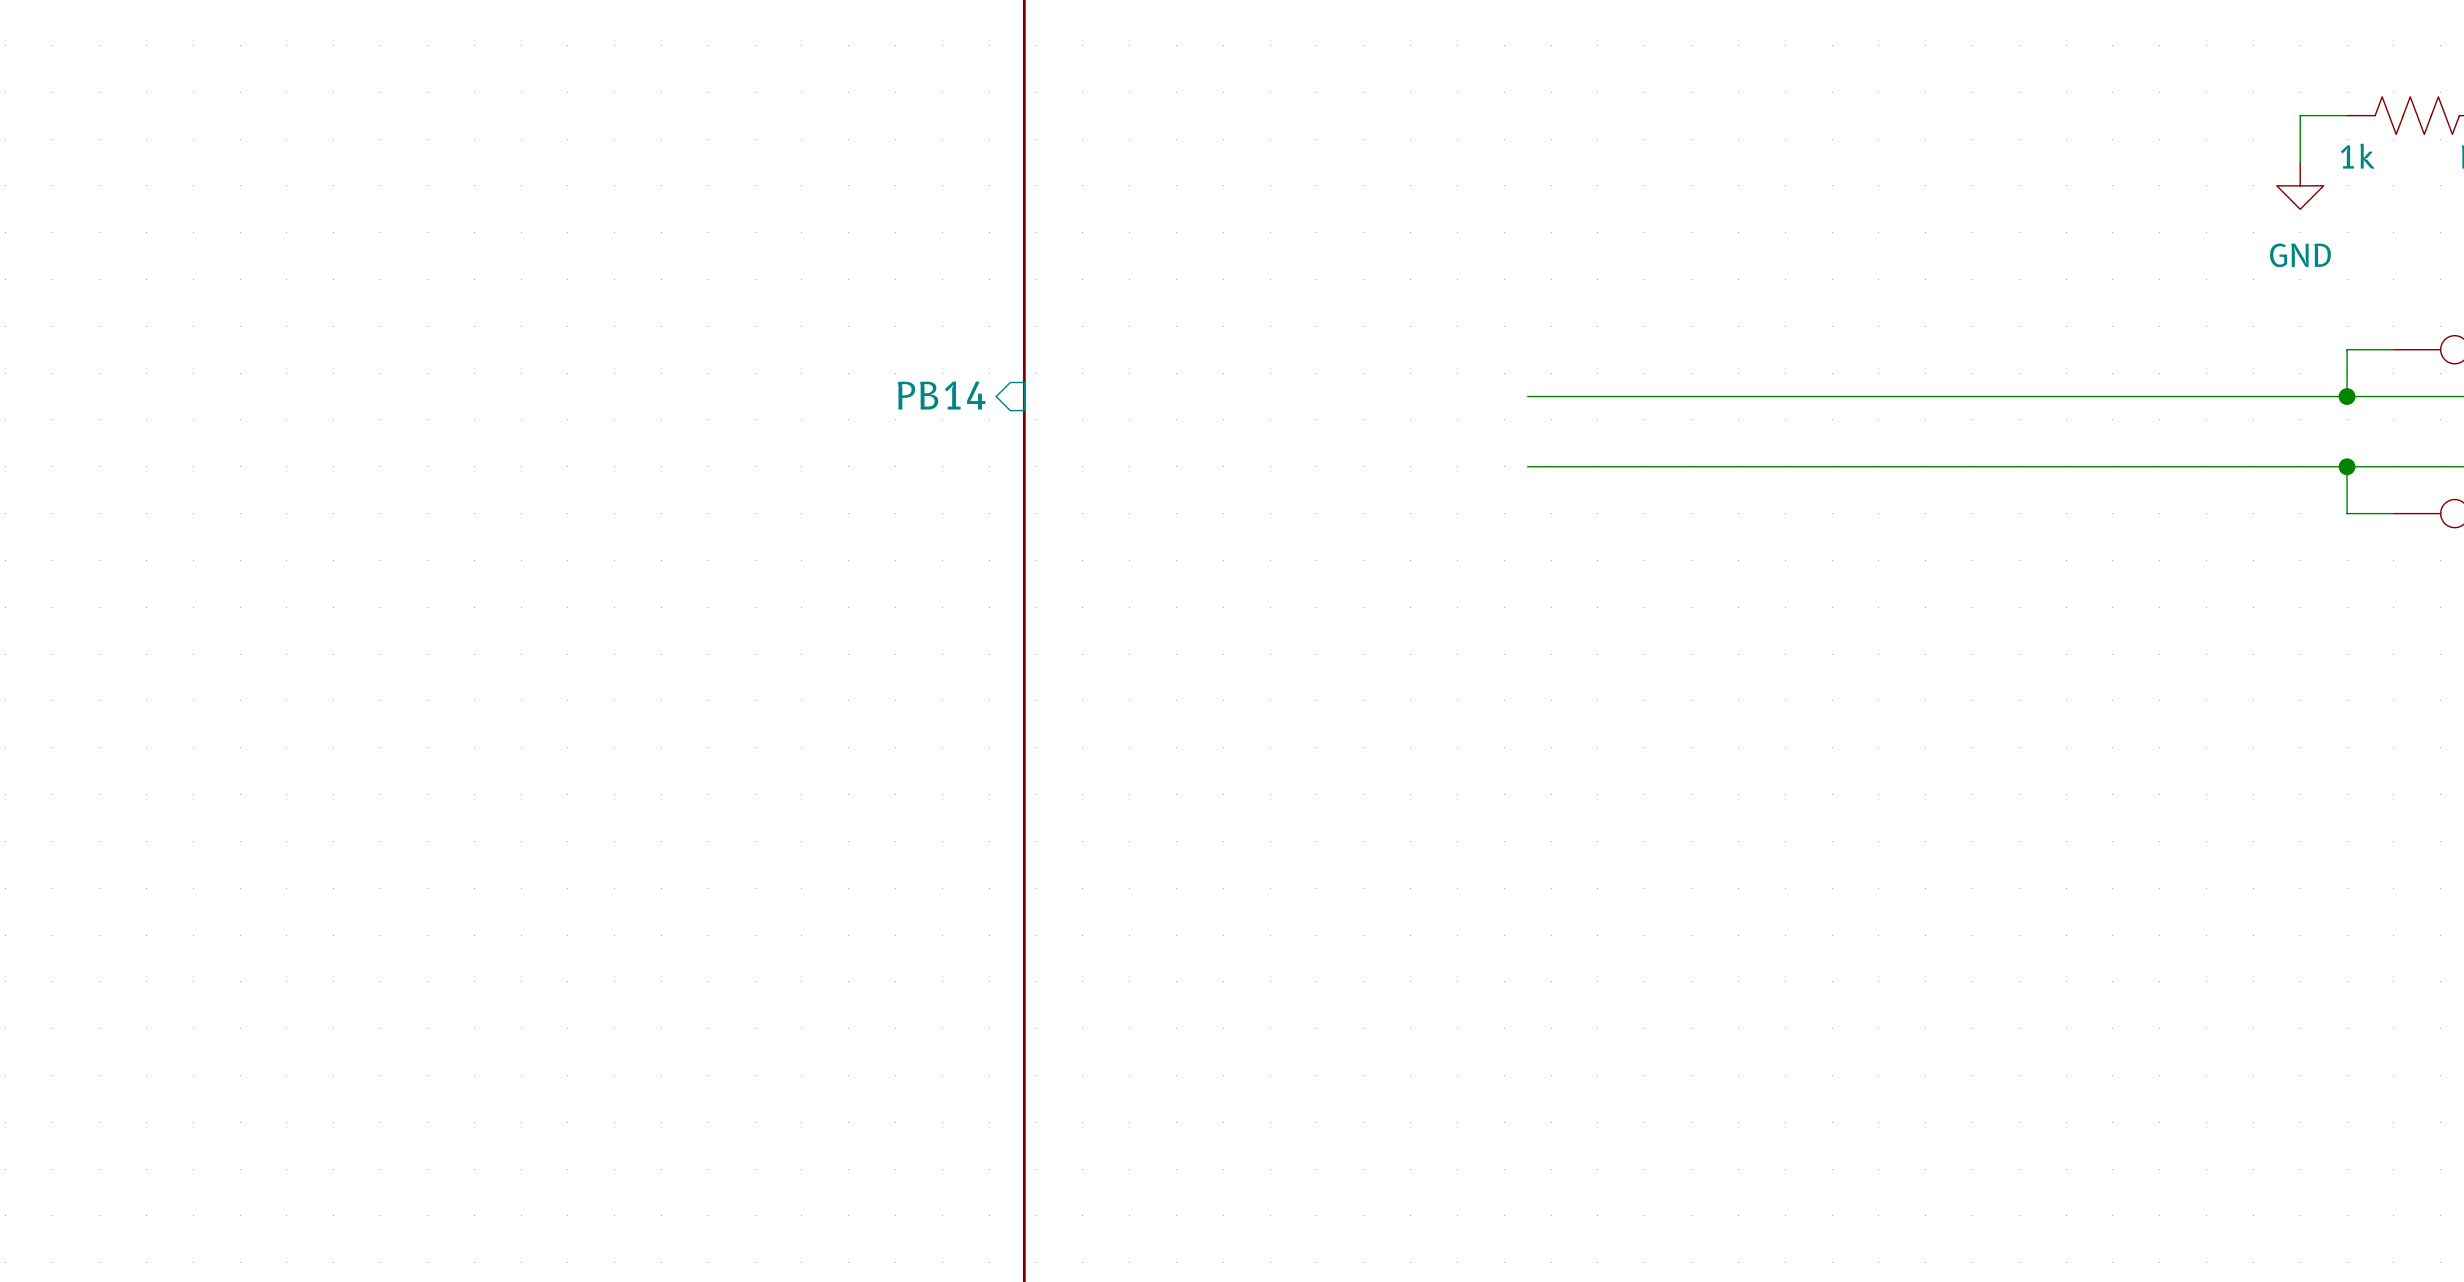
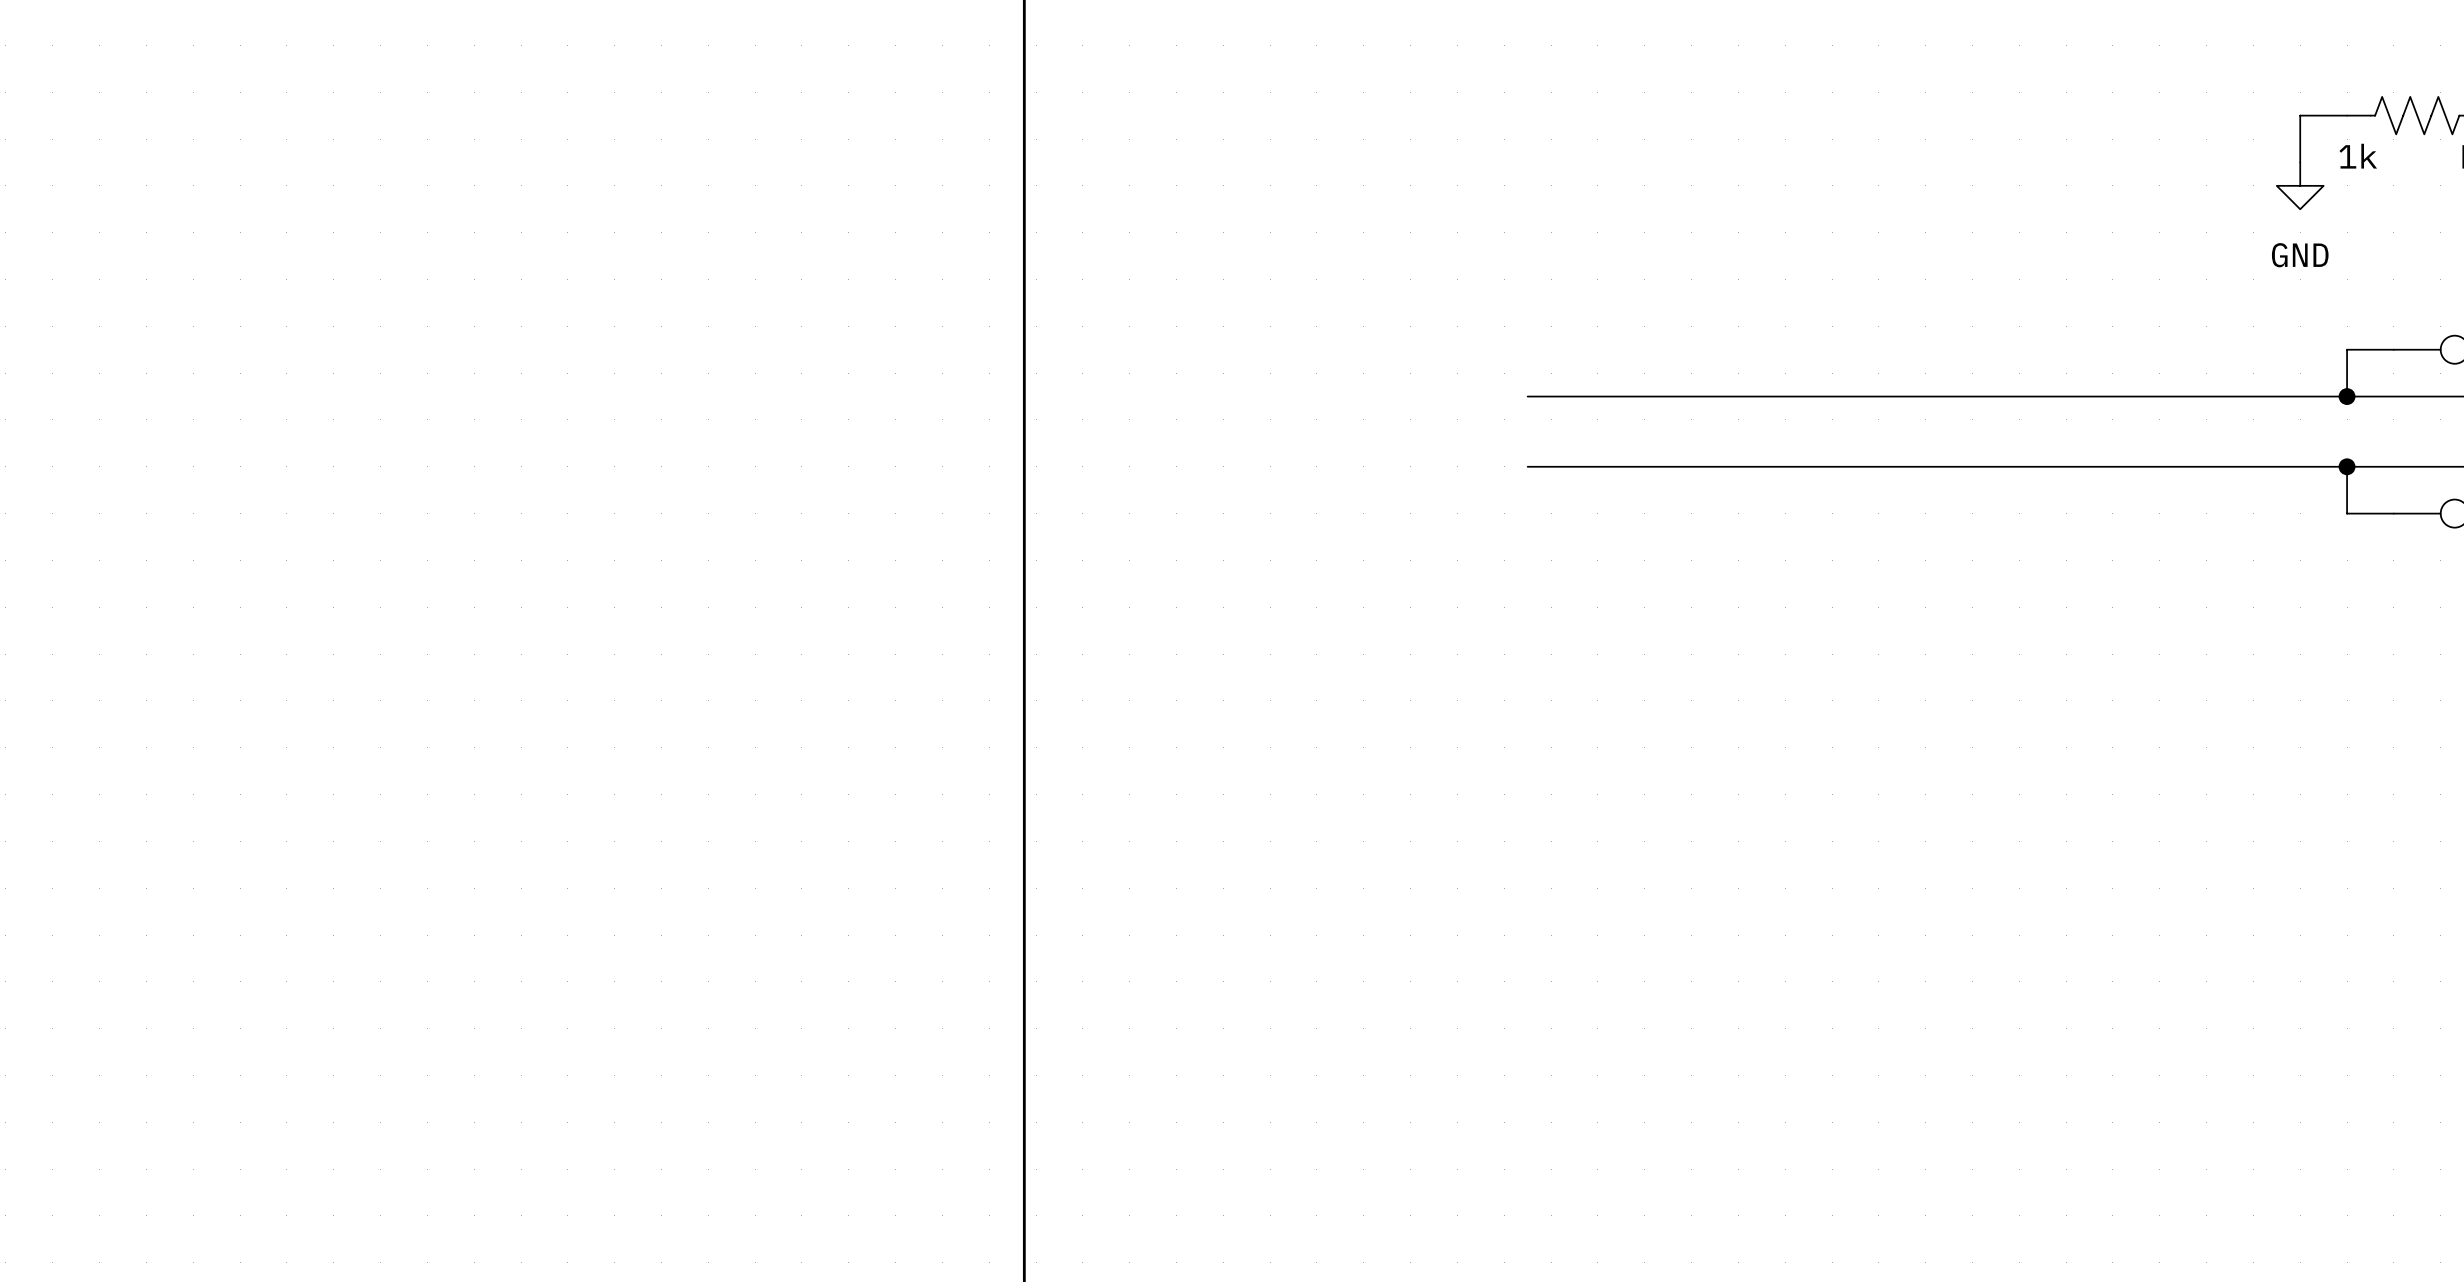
sheet pin: PB14 (941, 395) -> none

